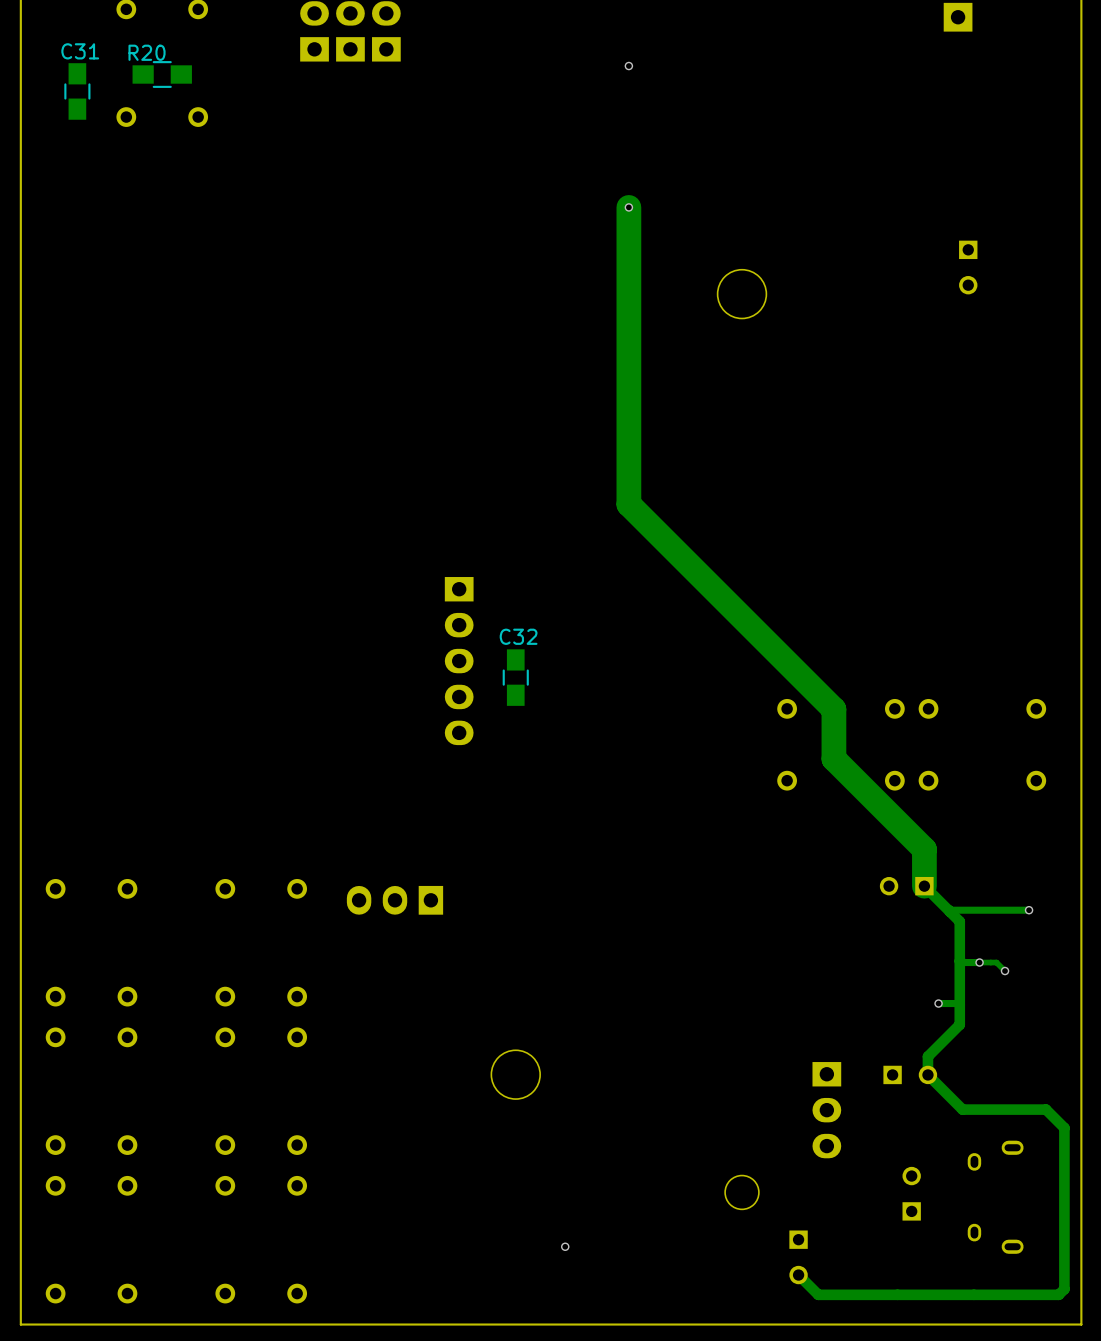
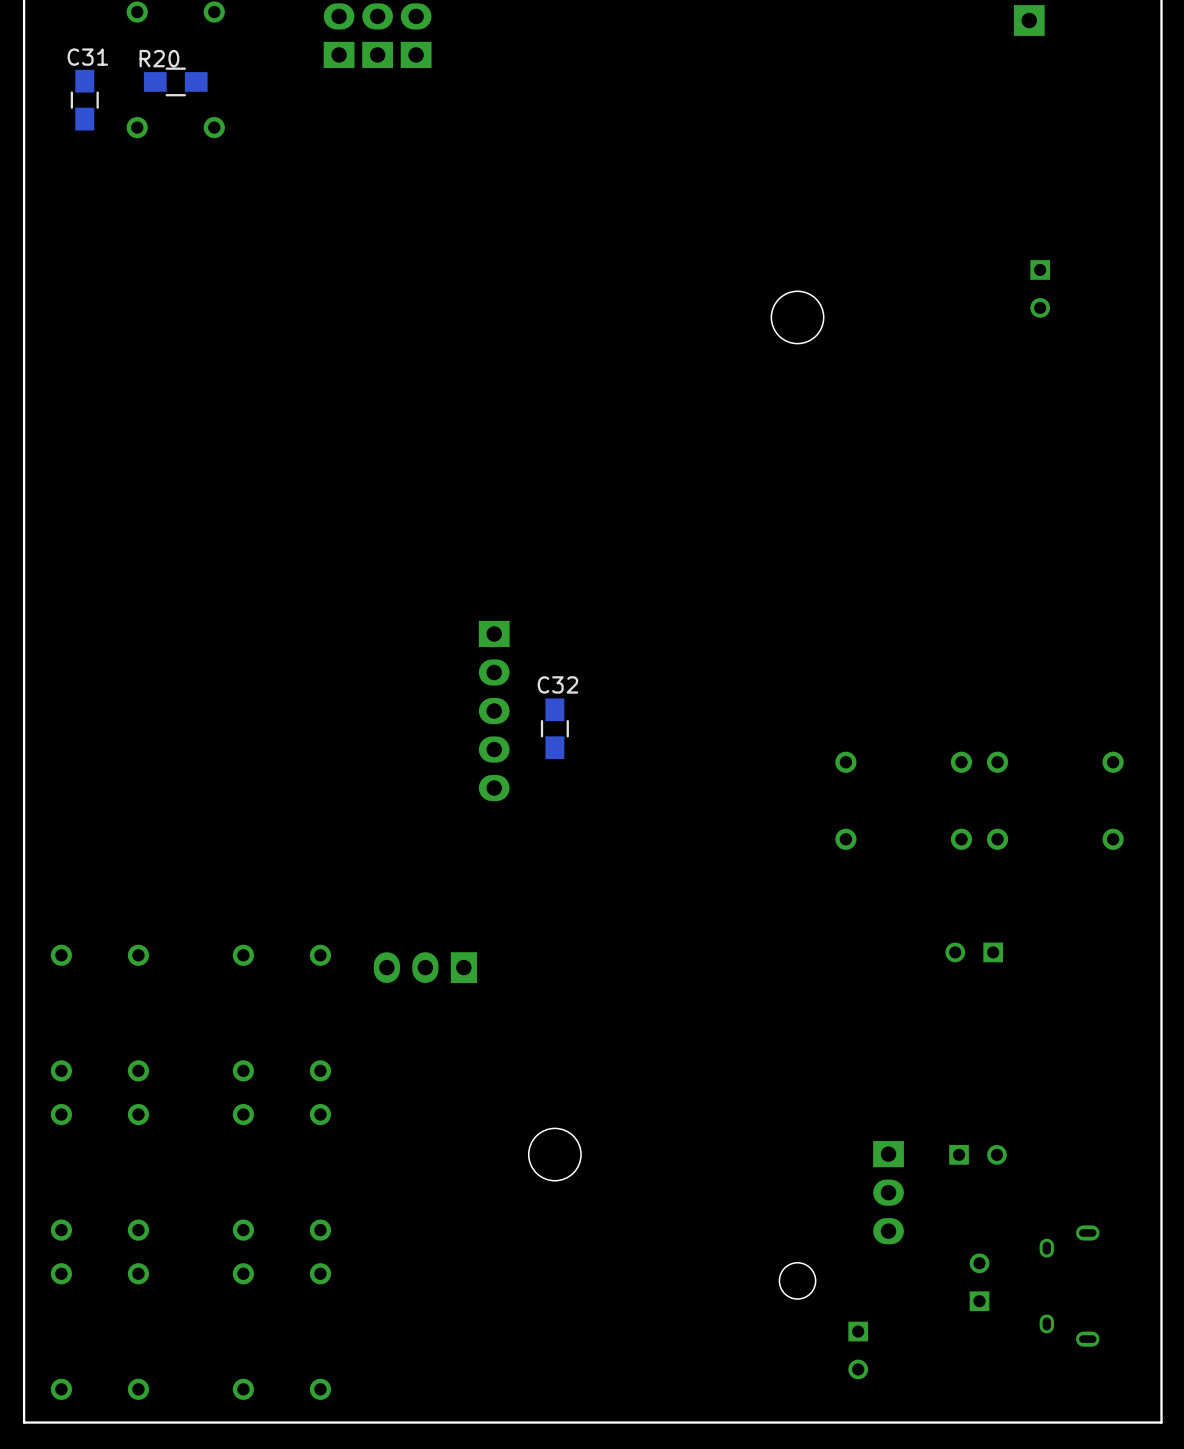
via: (628, 66) -> none
track: (628, 207) (628, 504) (833, 709) (833, 758) (924, 849) (924, 886) (959, 921) (959, 1024) (927, 1056) (927, 1074) (962, 1109) (1046, 1109) (1064, 1127) (1064, 1289) (1058, 1294) (818, 1294) (798, 1275) -> none
via: (628, 207) -> none
track: (1029, 910) (948, 910) (949, 908) (949, 911) -> none
via: (1029, 910) -> none
track: (961, 961) (959, 962) (996, 962) (1005, 971) -> none
via: (979, 962) -> none
via: (1005, 971) -> none
track: (938, 1003) (959, 1004) -> none
via: (938, 1003) -> none
via: (565, 1246) -> none

